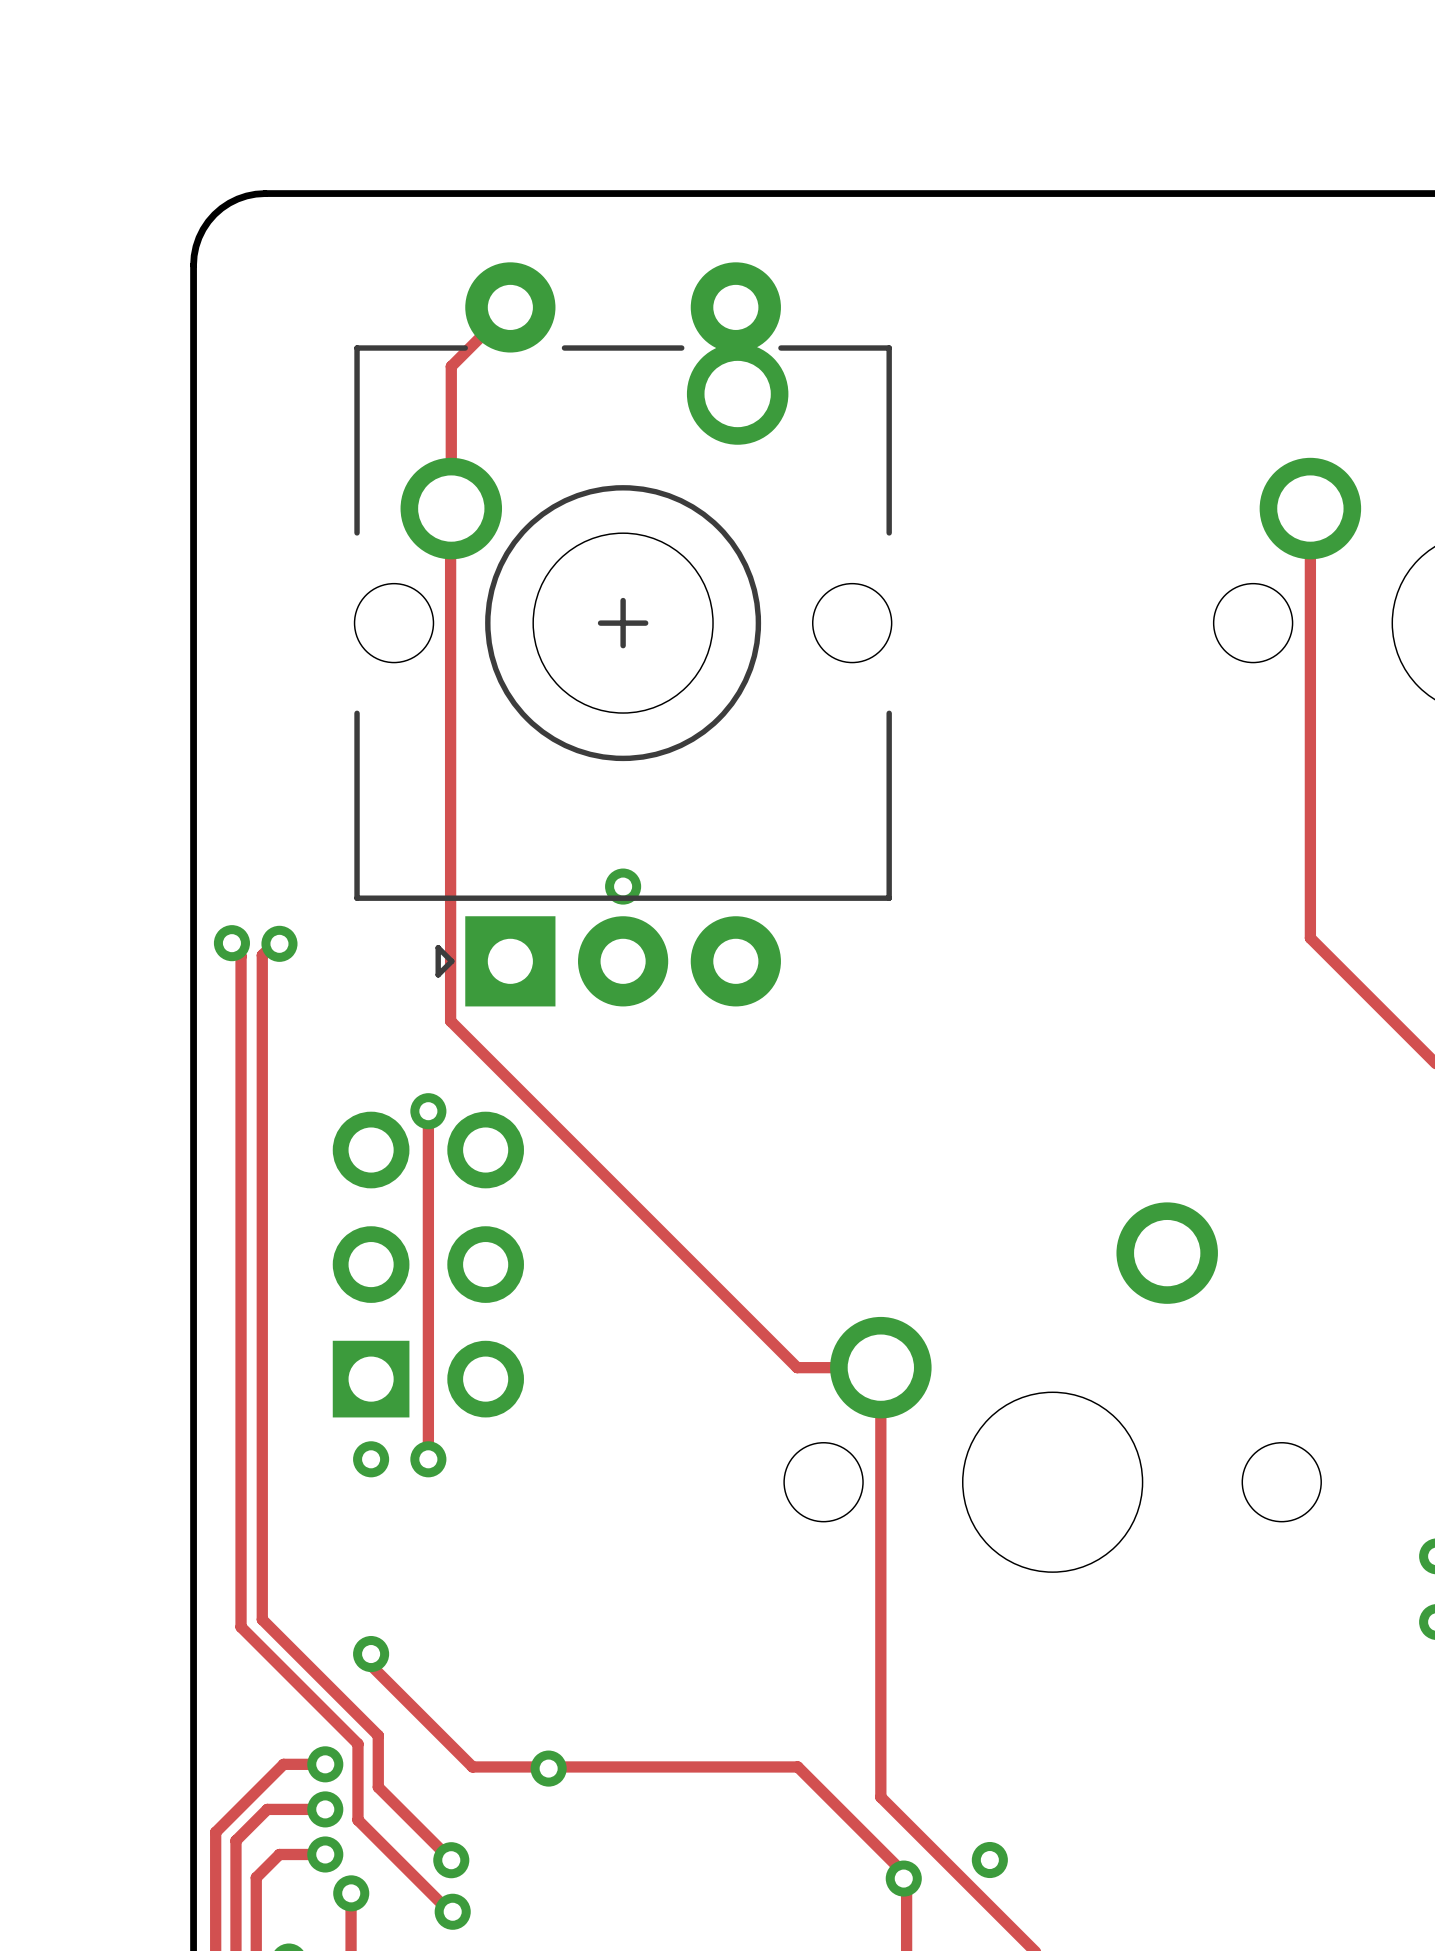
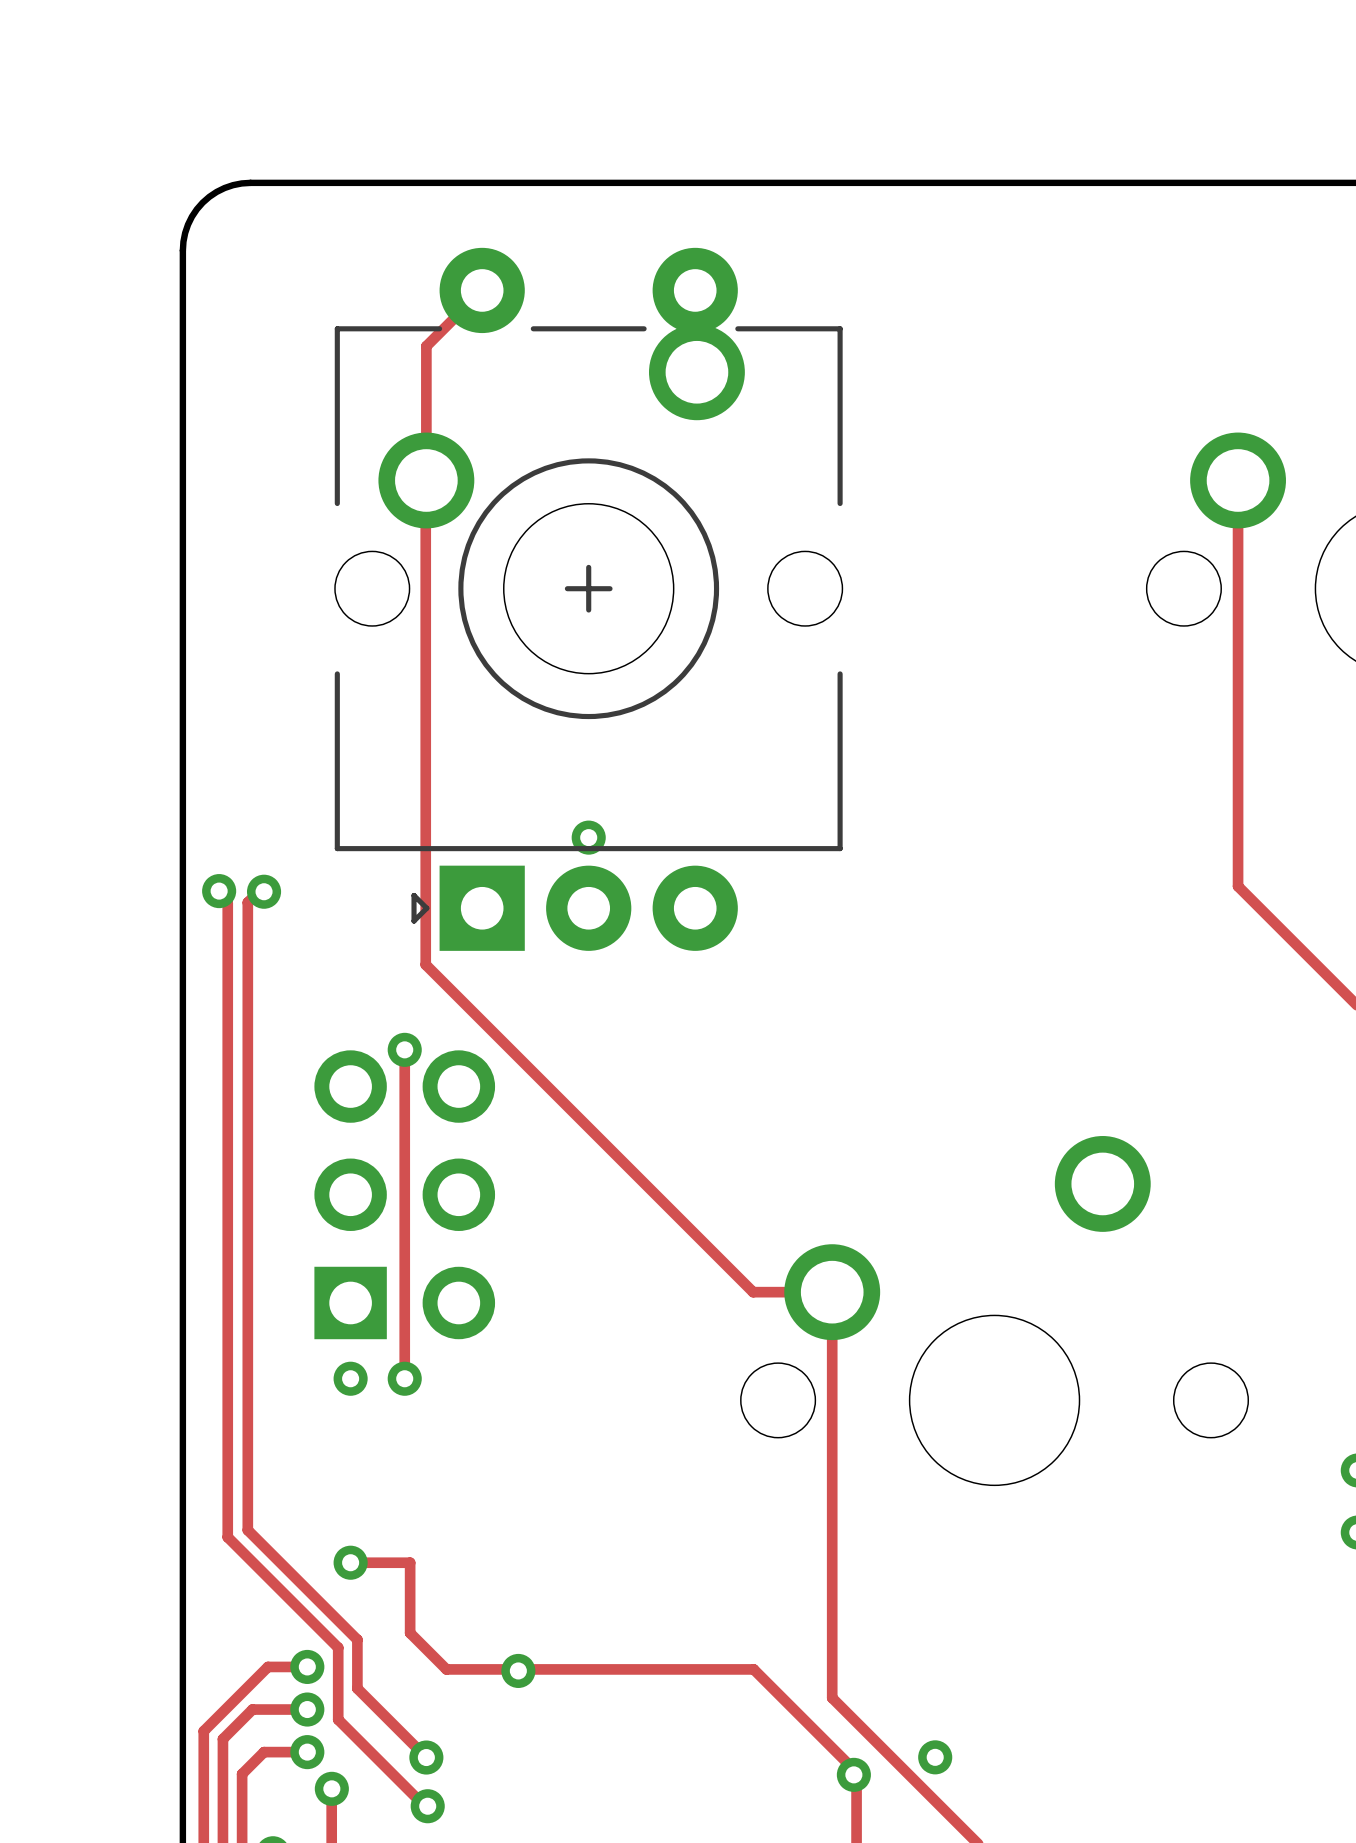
track: (371, 1654) (371, 1665) (434, 1728) -> (350, 1562) (410, 1562) (410, 1633)

